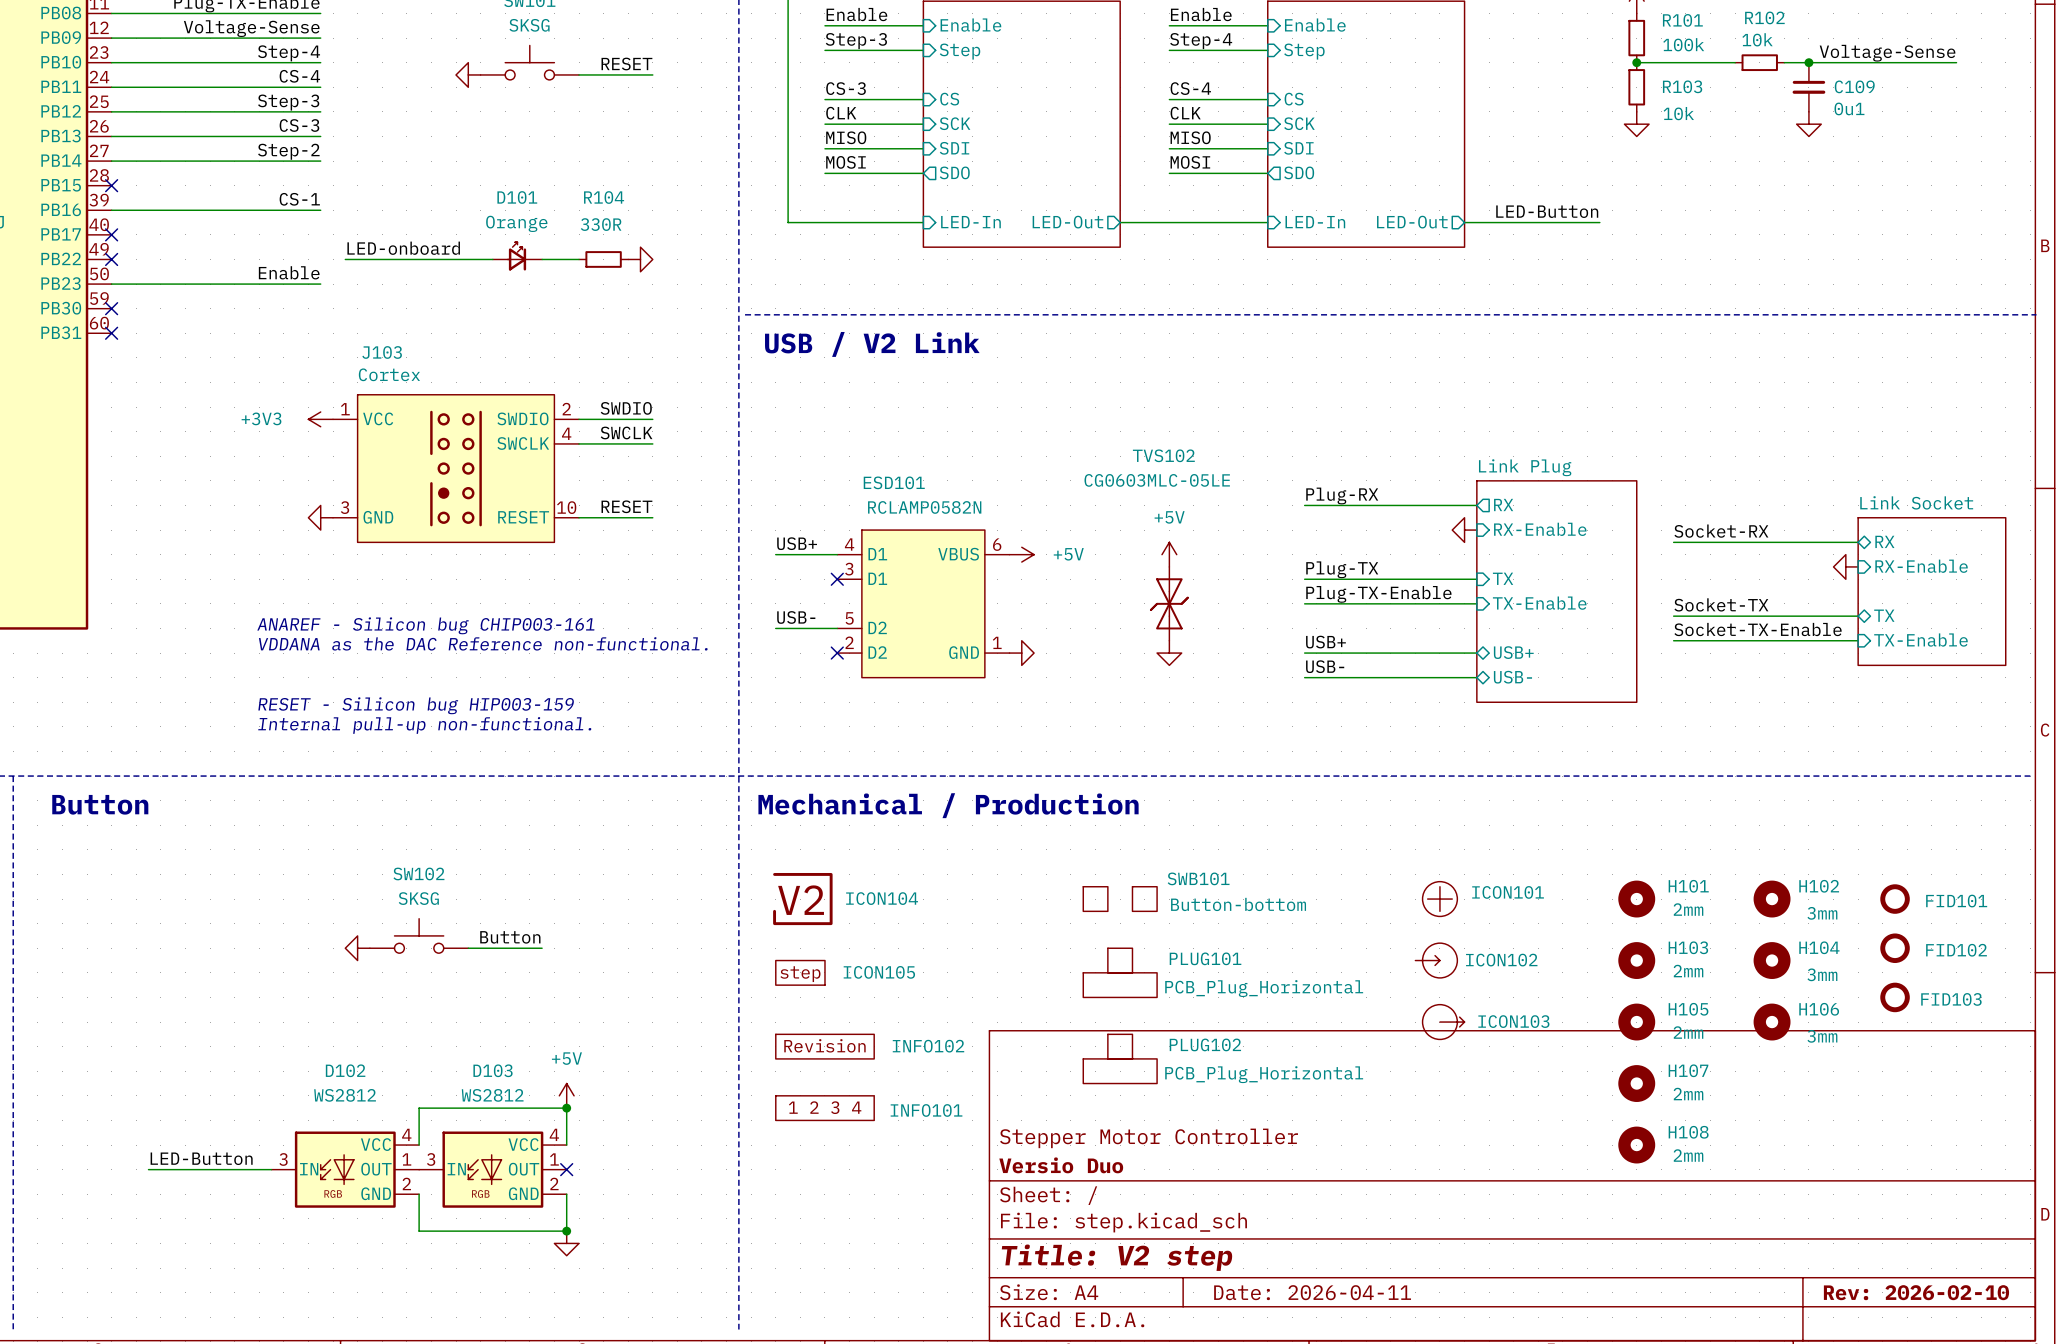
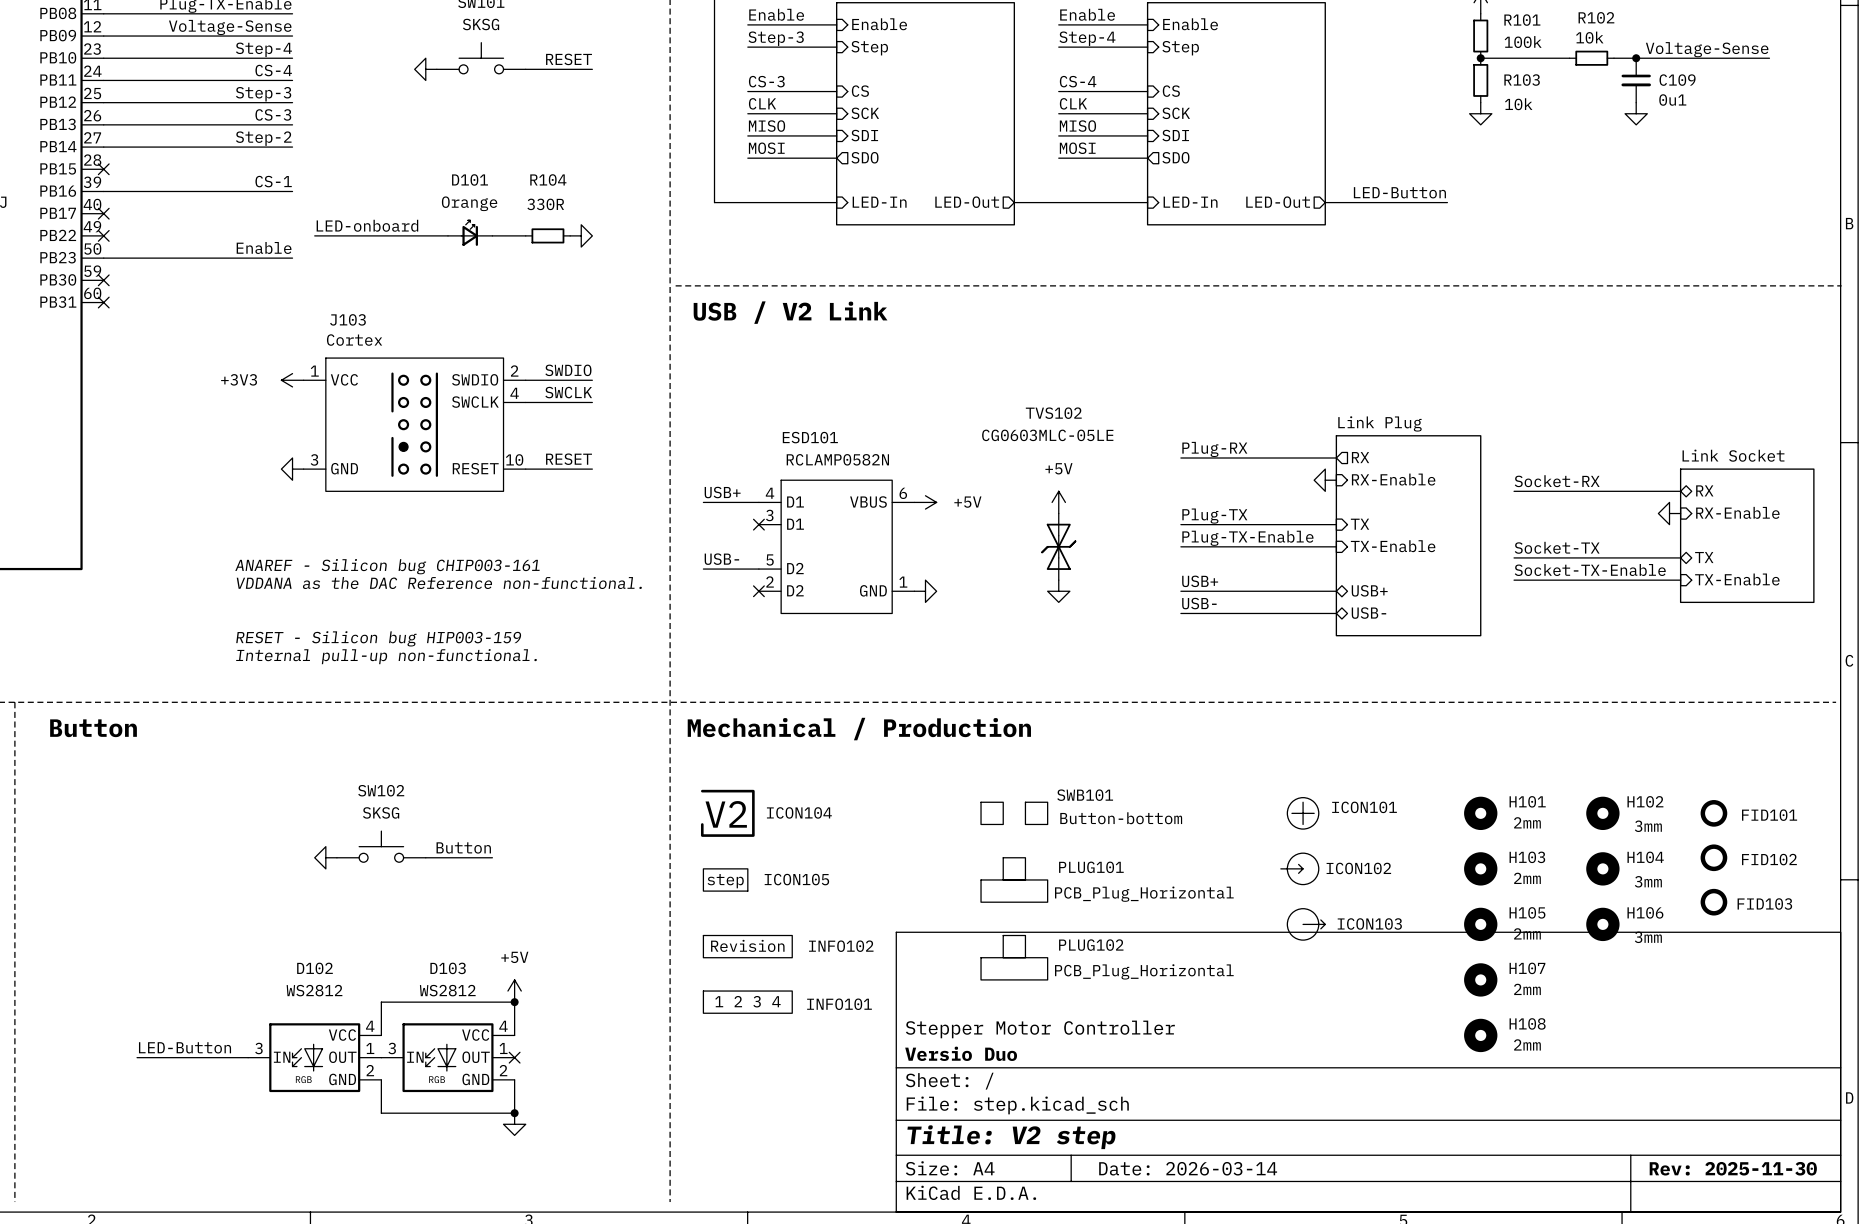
title block: Date: 2026-04-11 (1312, 1292) -> Date: 2026-03-14 (1188, 1168)
title block: Rev: 2026-02-10 (1916, 1292) -> Rev: 2025-11-30 (1733, 1168)

